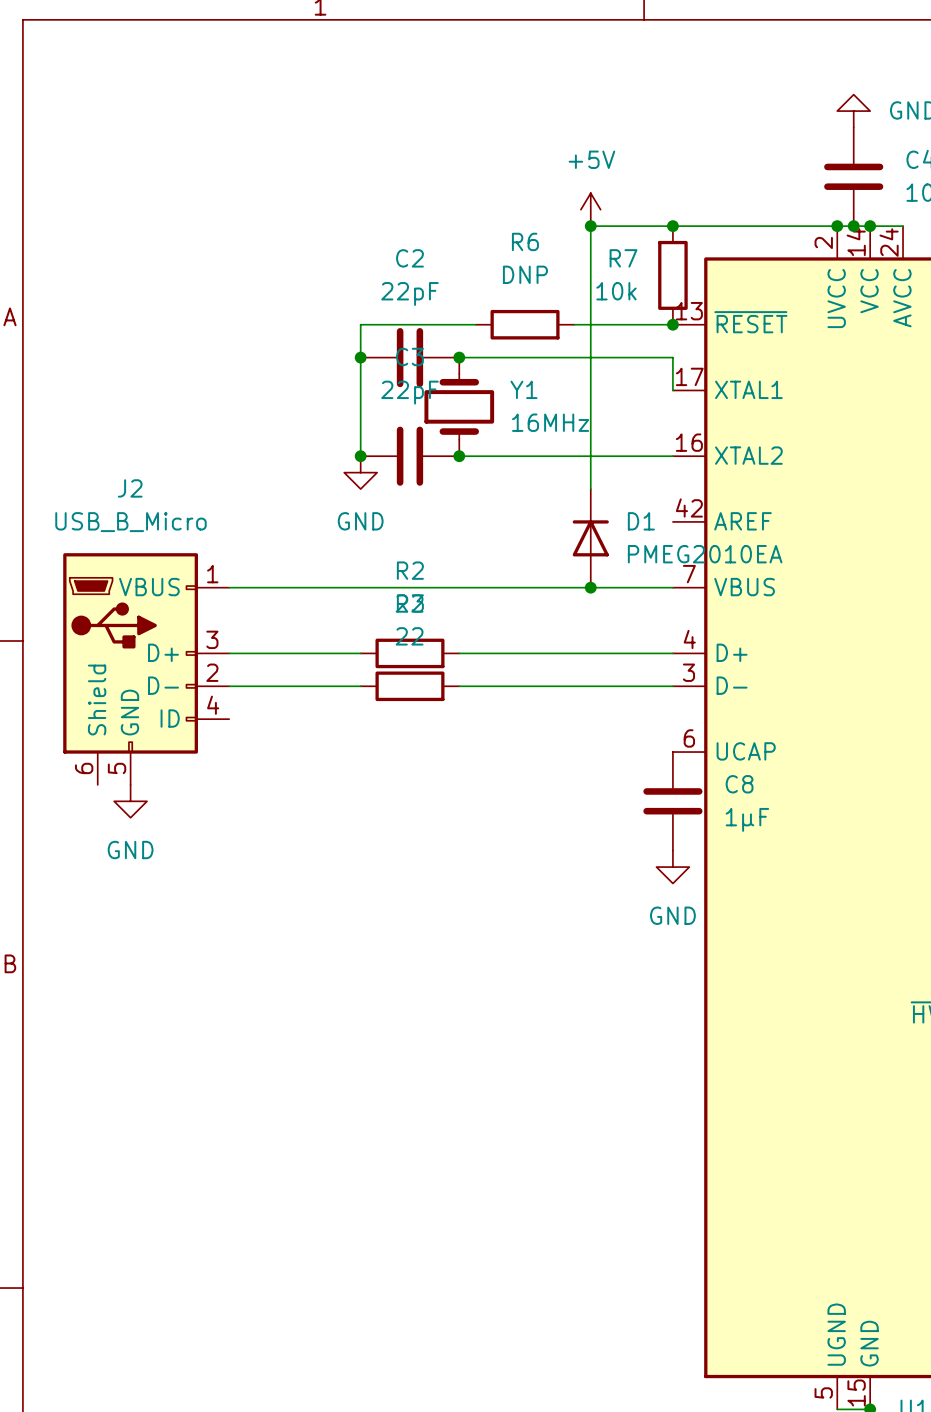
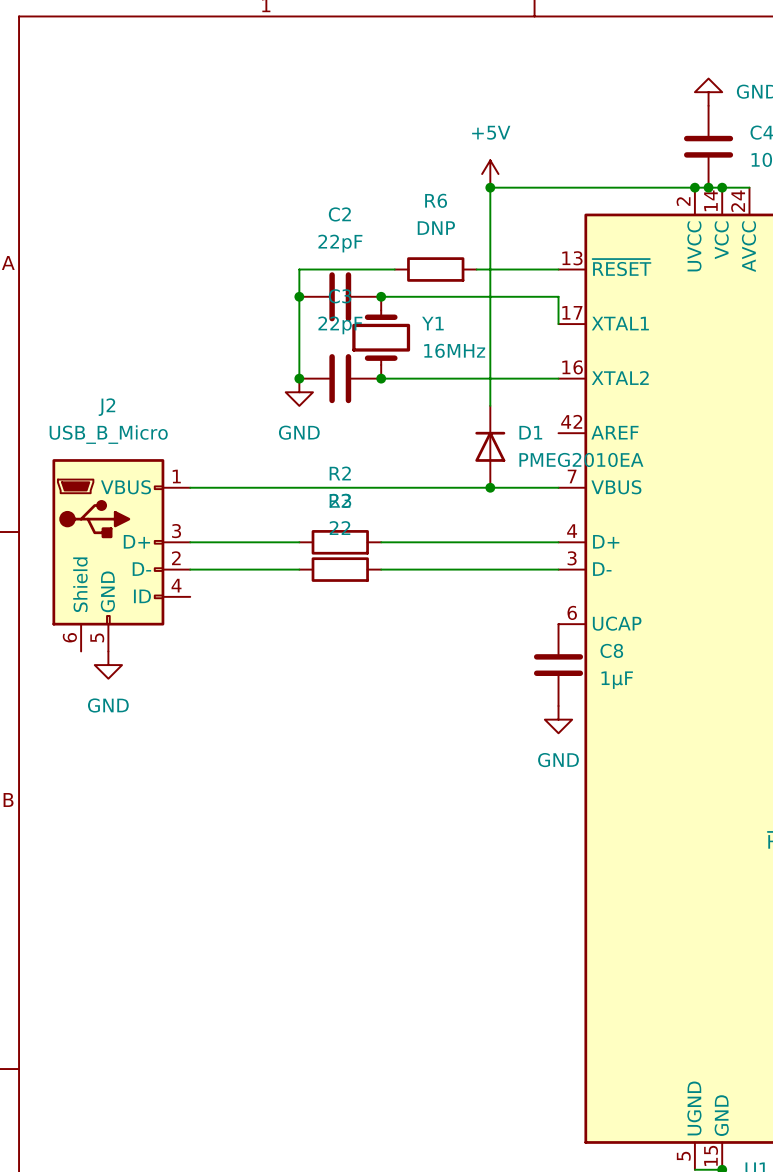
junction: (672, 226) -> none
R7: 10k (672, 275) -> none
junction: (672, 324) -> none

